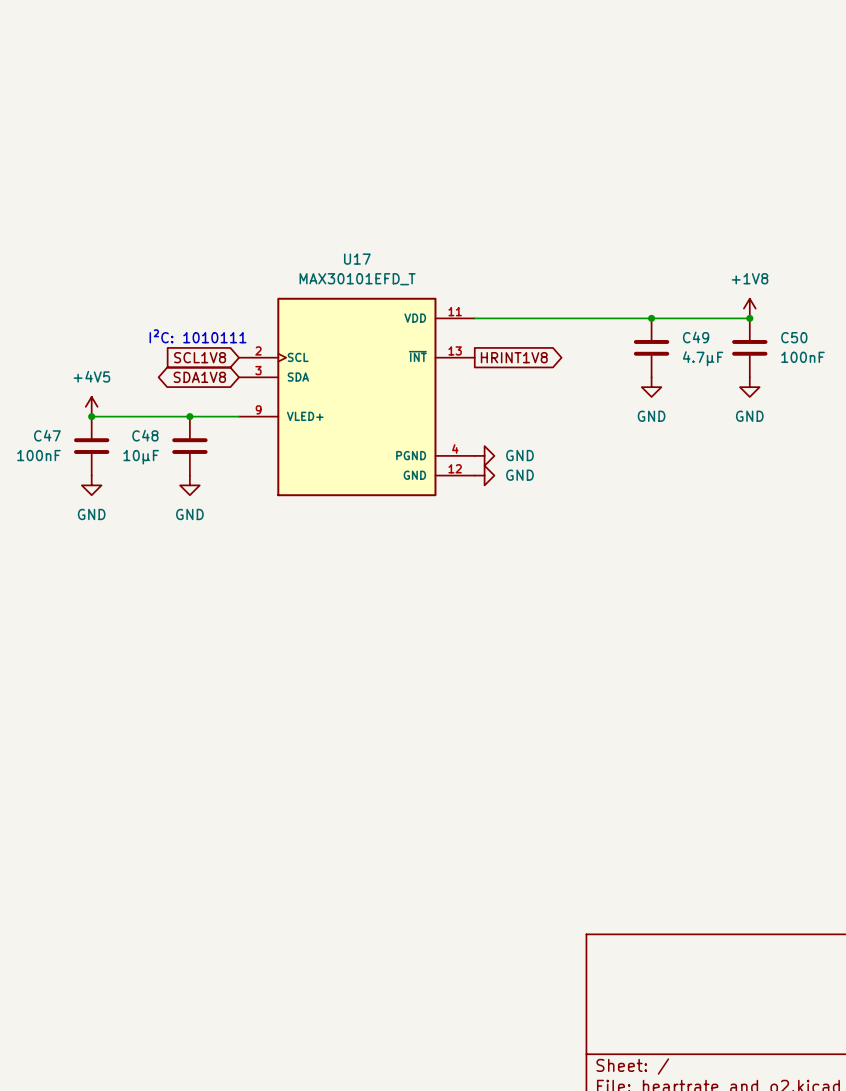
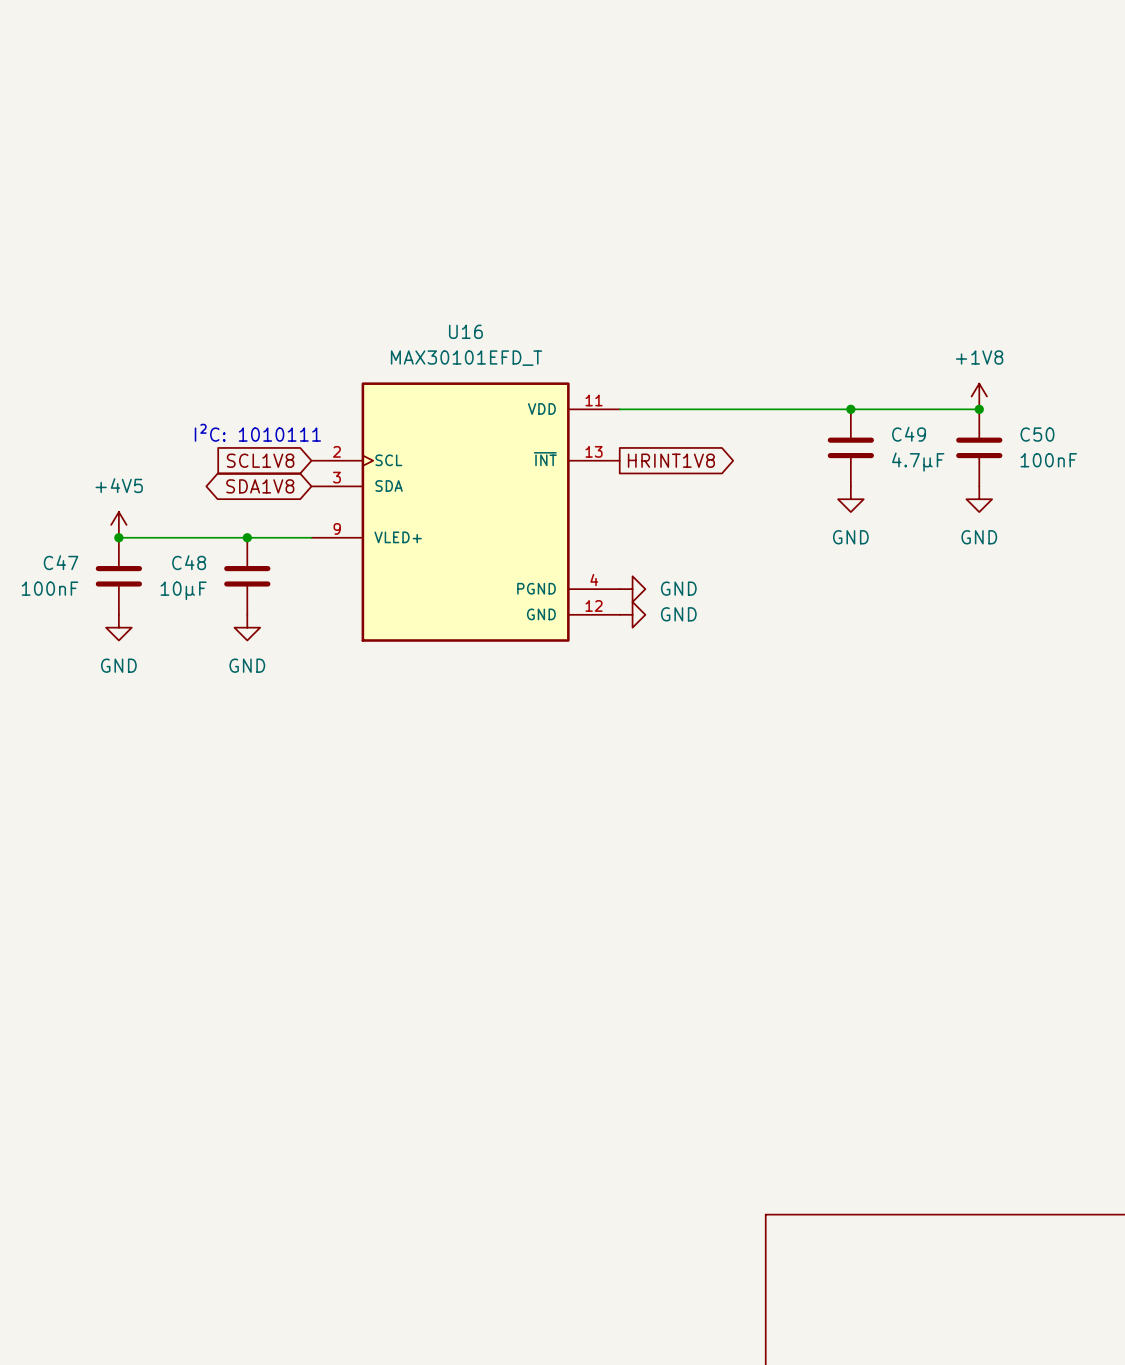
U17 name: U17 (357, 259) -> U16 (465, 331)

